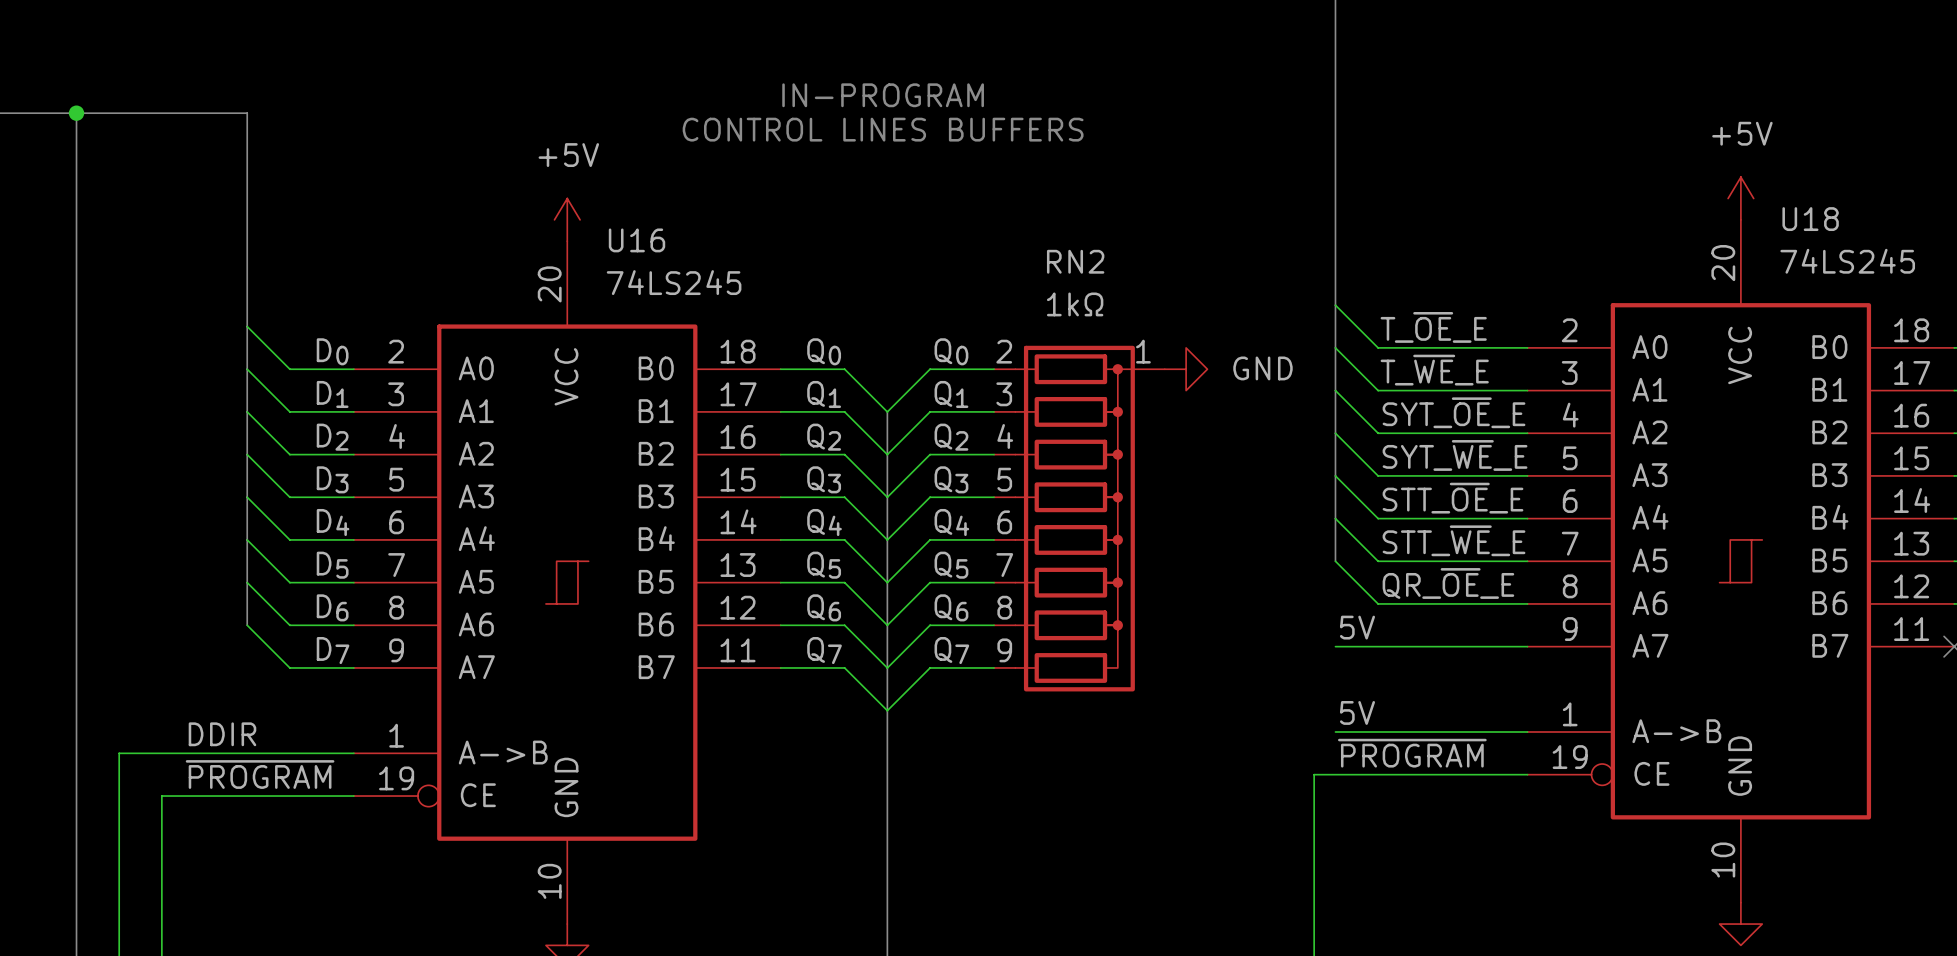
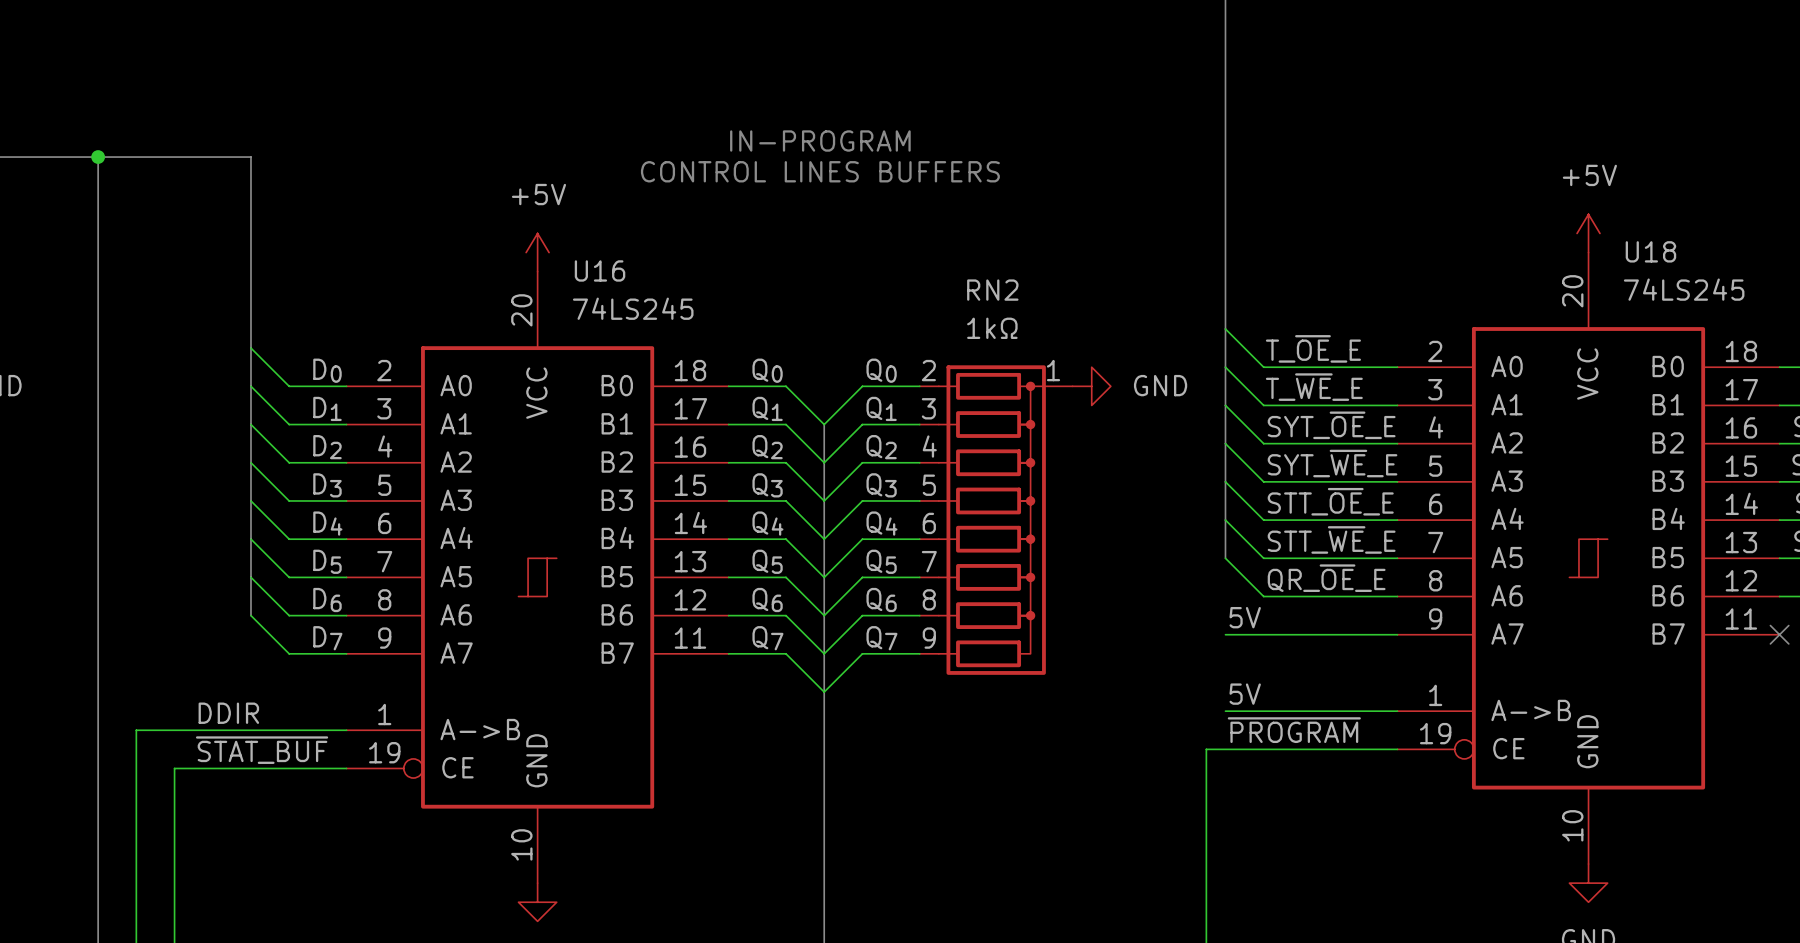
label: ~{PROGRAM} (260, 774) -> ~{STAT_BUF} (262, 750)

